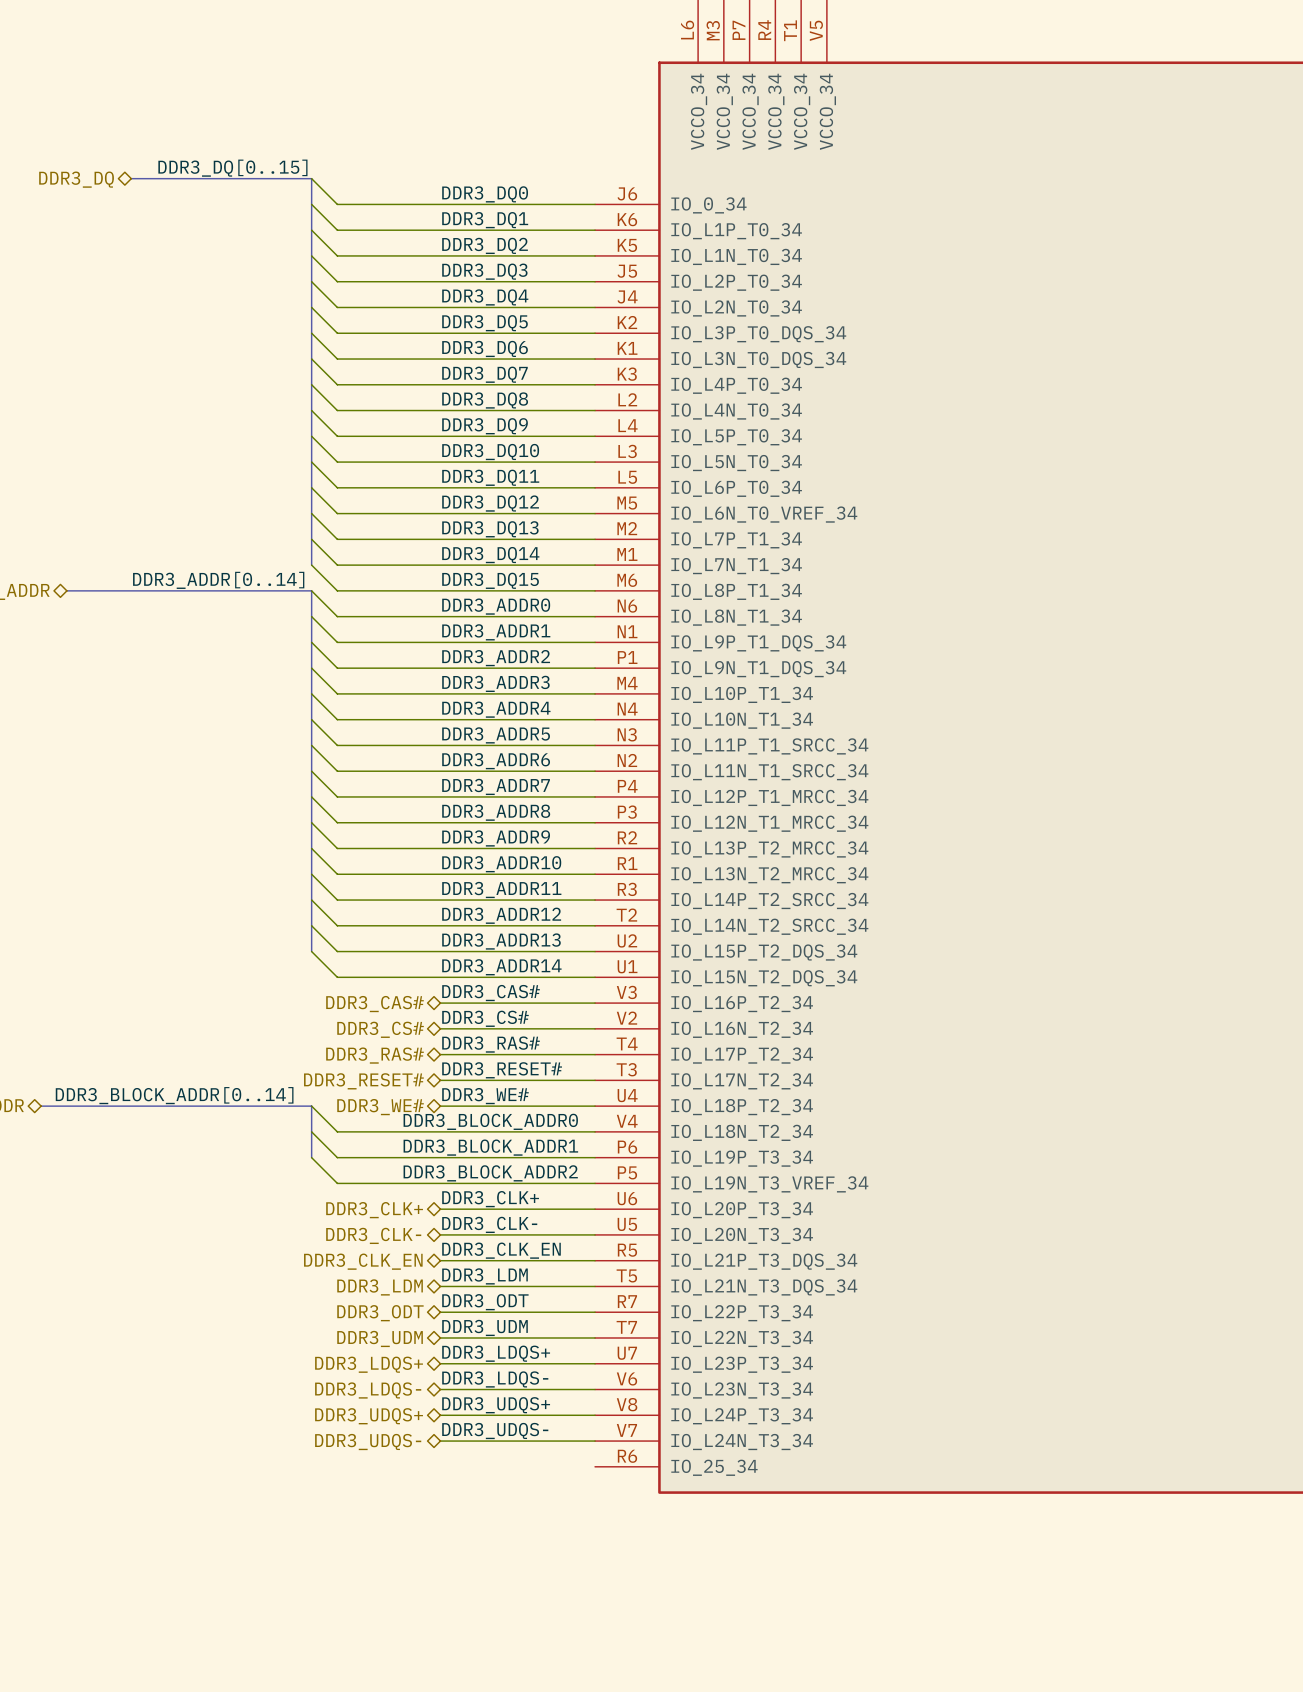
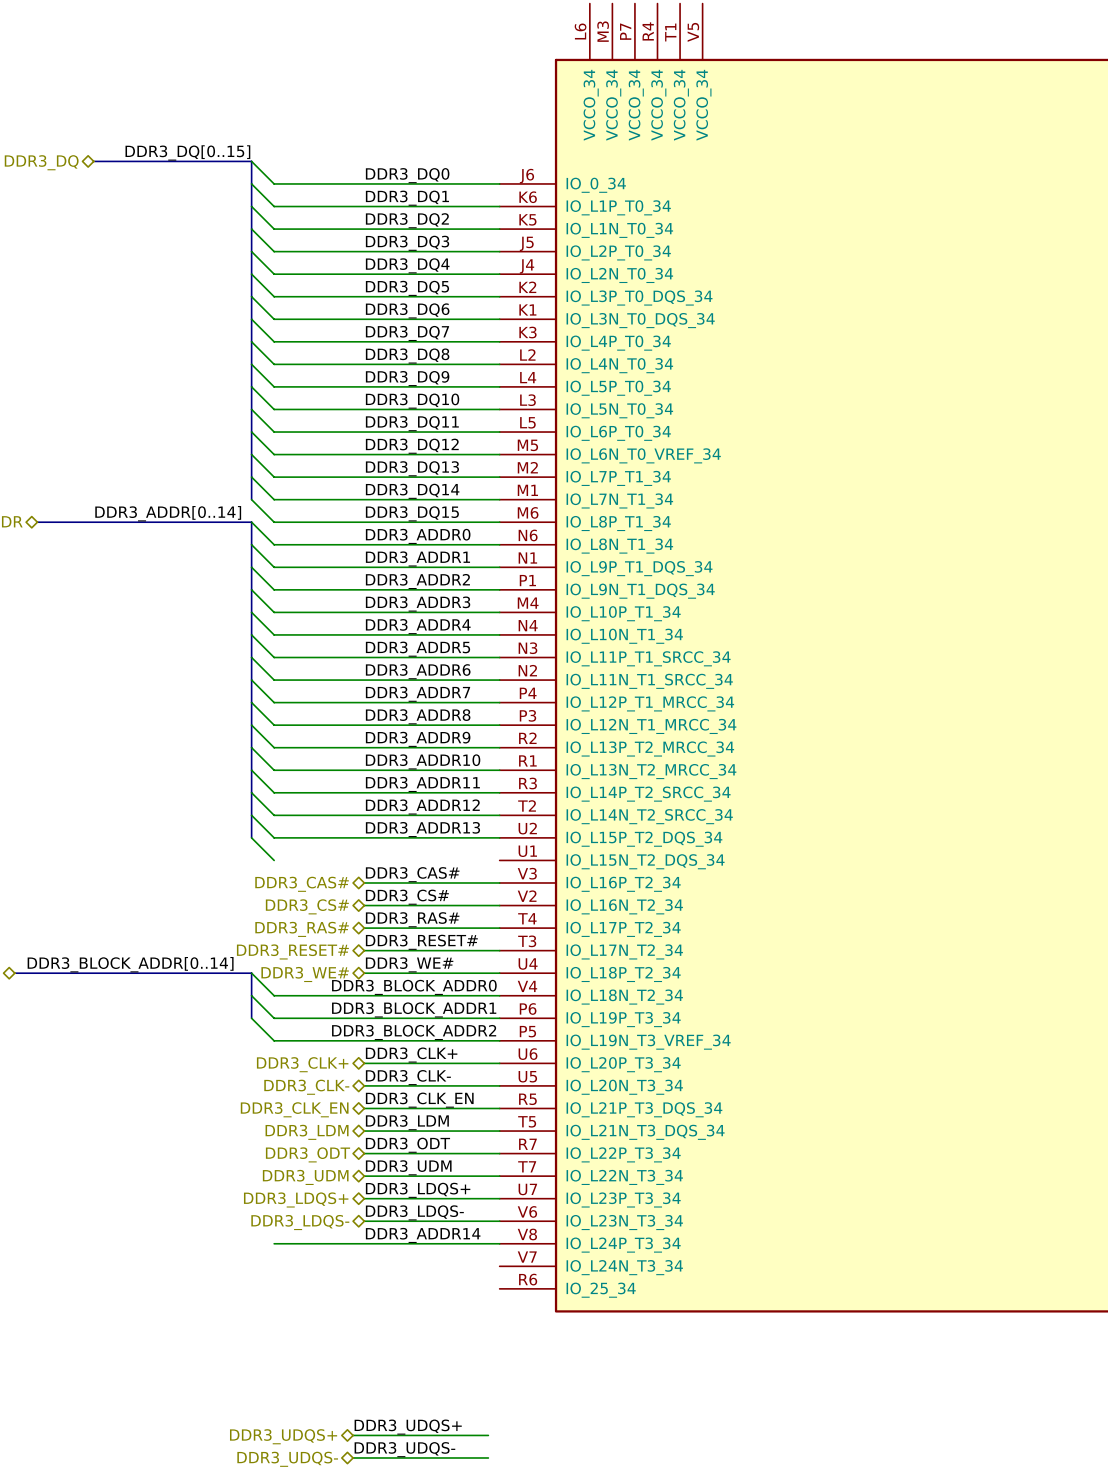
label: DDR3_ADDR14 (501, 967) -> none
wire: (337, 977) (595, 977) -> none
label: DDR3_UDQS+ (496, 1405) -> DDR3_ADDR14 (423, 1235)
wire: none -> (274, 1243) (364, 1243)
hierarchical label position: DDR3_UDQS+ (369, 1416) -> DDR3_UDQS+ (283, 1436)
label position: DDR3_UDQS- (495, 1431) -> DDR3_UDQS- (404, 1449)
wire: (440, 1441) (595, 1441) -> (353, 1435) (488, 1435)
hierarchical label position: DDR3_UDQS- (368, 1442) -> DDR3_UDQS- (287, 1459)
label: none -> DDR3_UDQS+ (408, 1427)
wire: none -> (353, 1457) (488, 1457)

